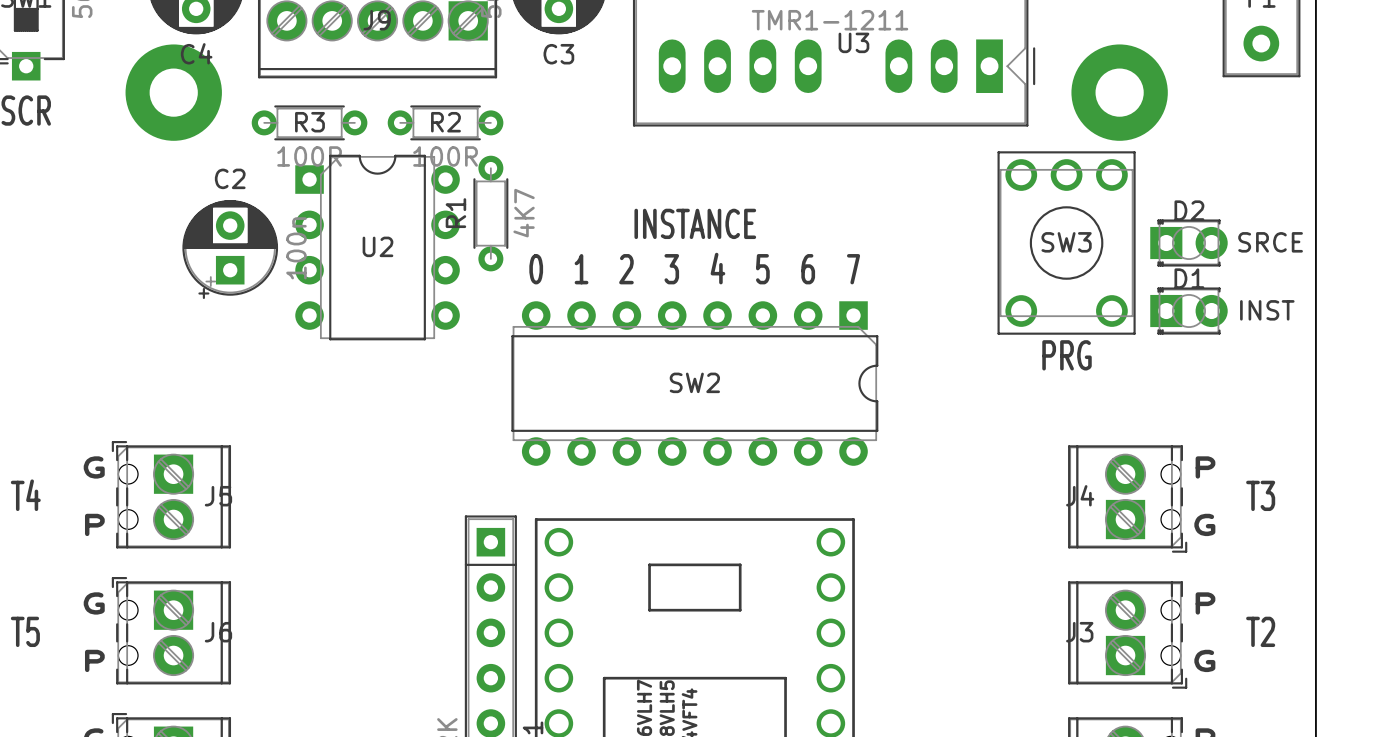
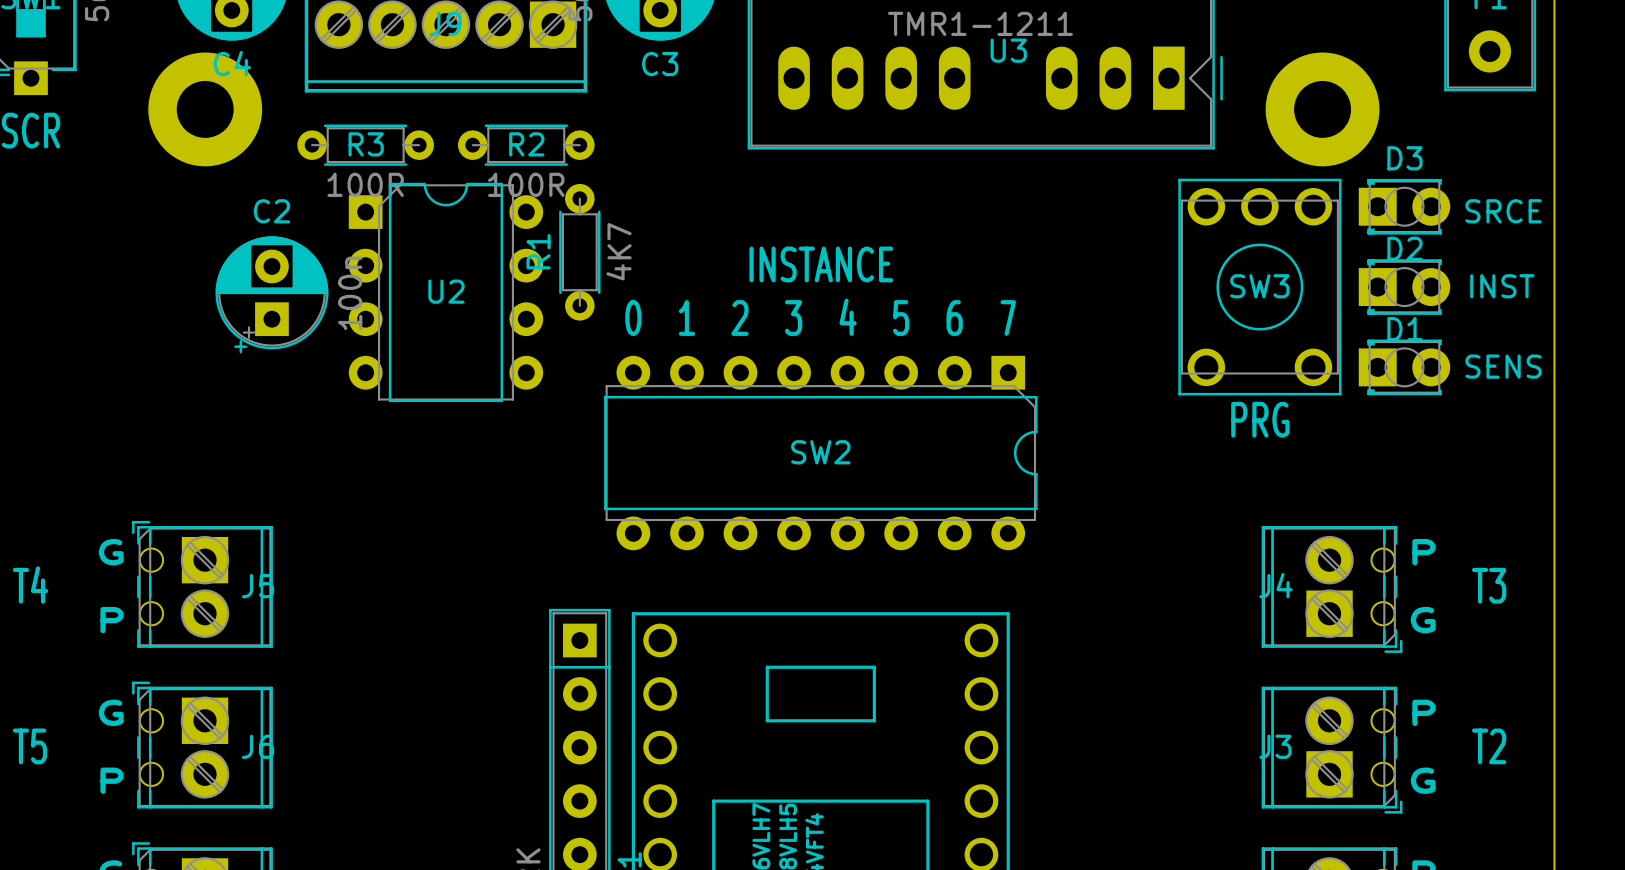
D3: none -> SRCE (1404, 206)
D2 value: SRCE (1270, 242) -> INST (1502, 286)
D1 value: INST (1267, 310) -> SENS (1503, 366)

